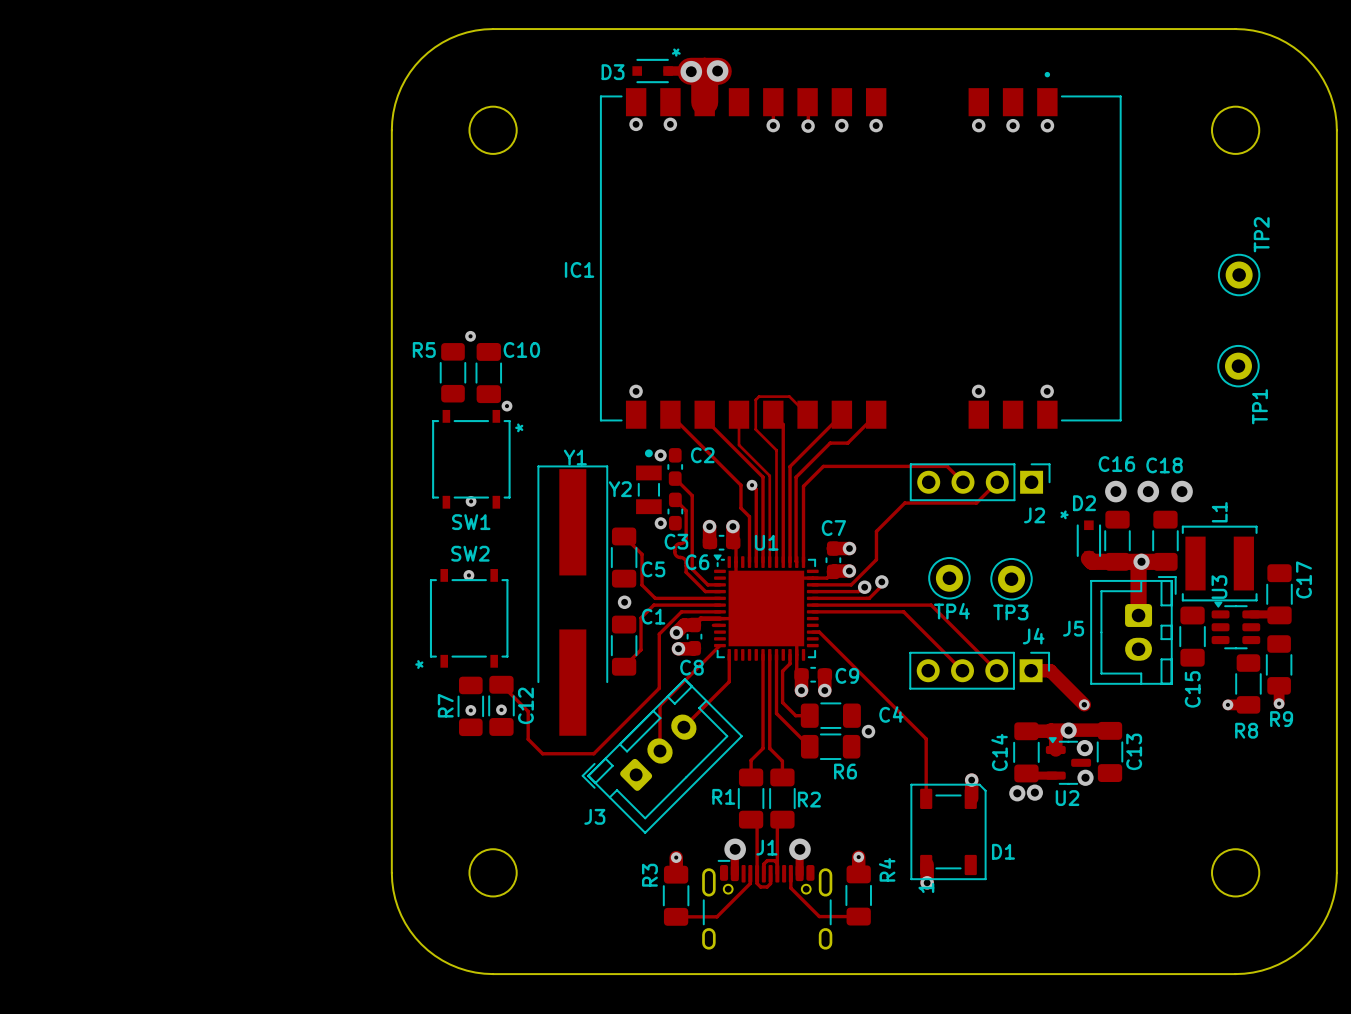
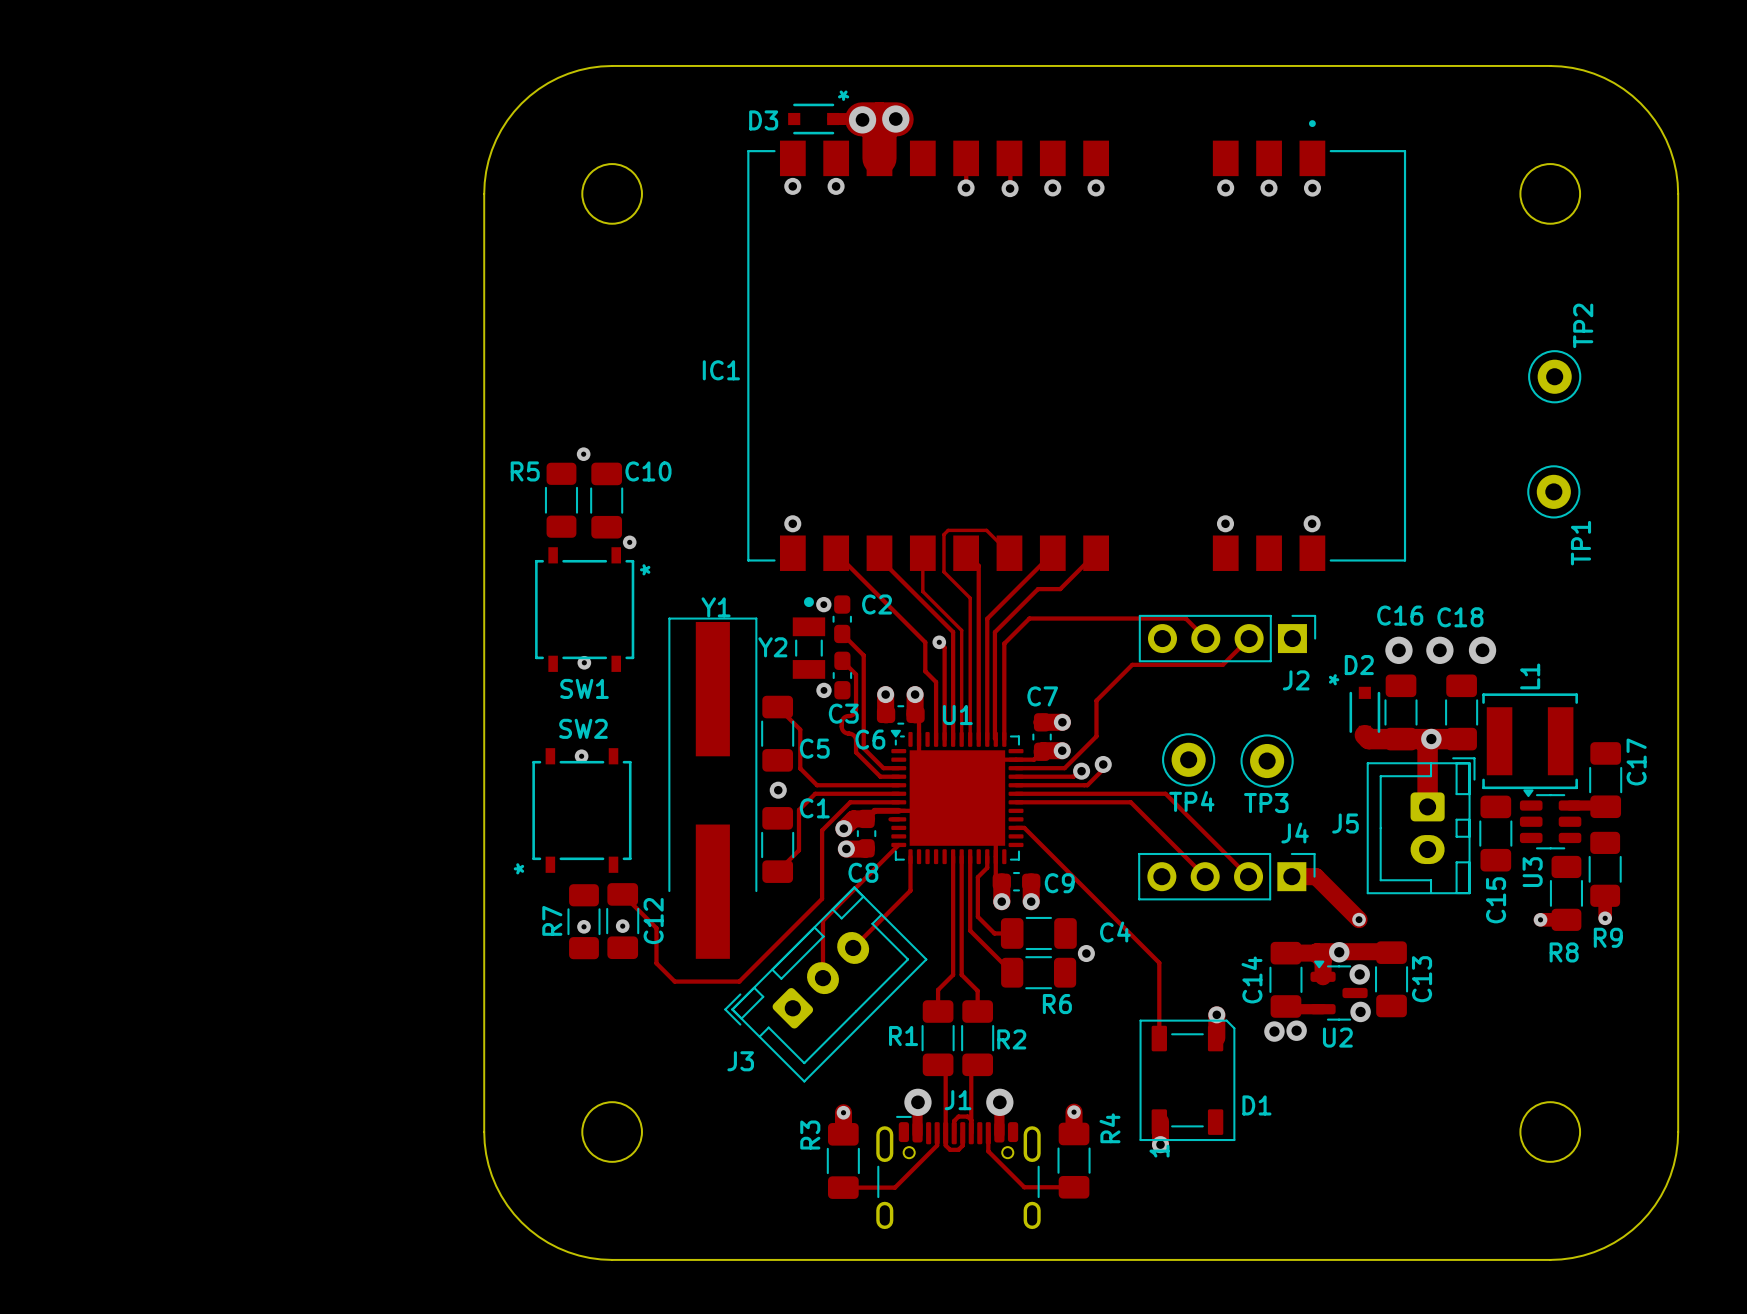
U3 name position: U3 (1219, 587) -> U3 (1532, 872)

